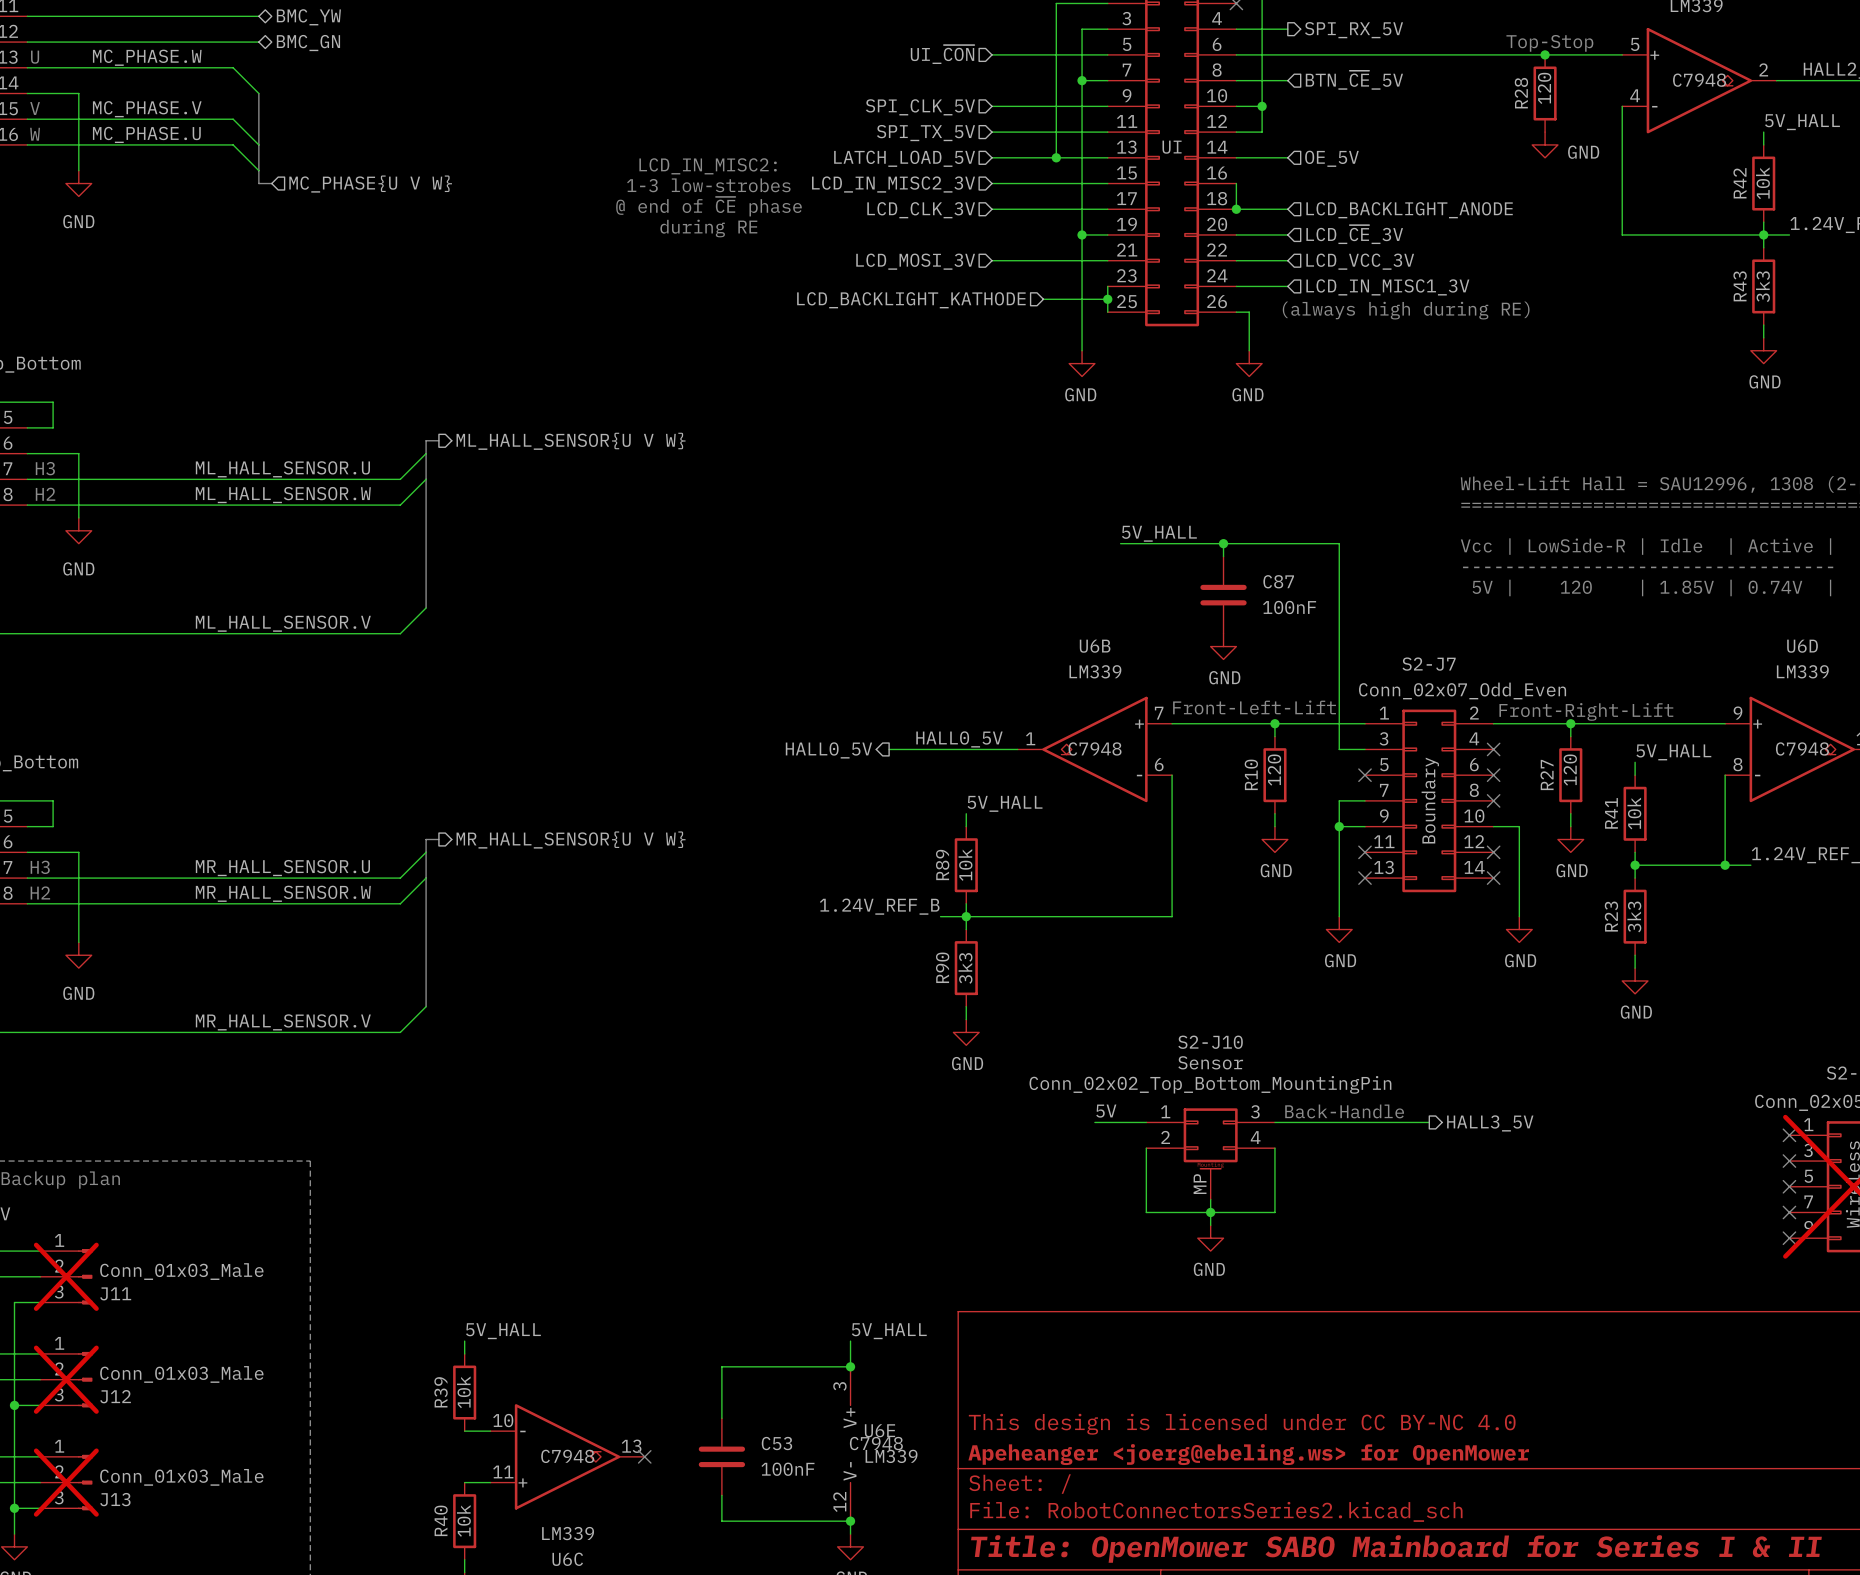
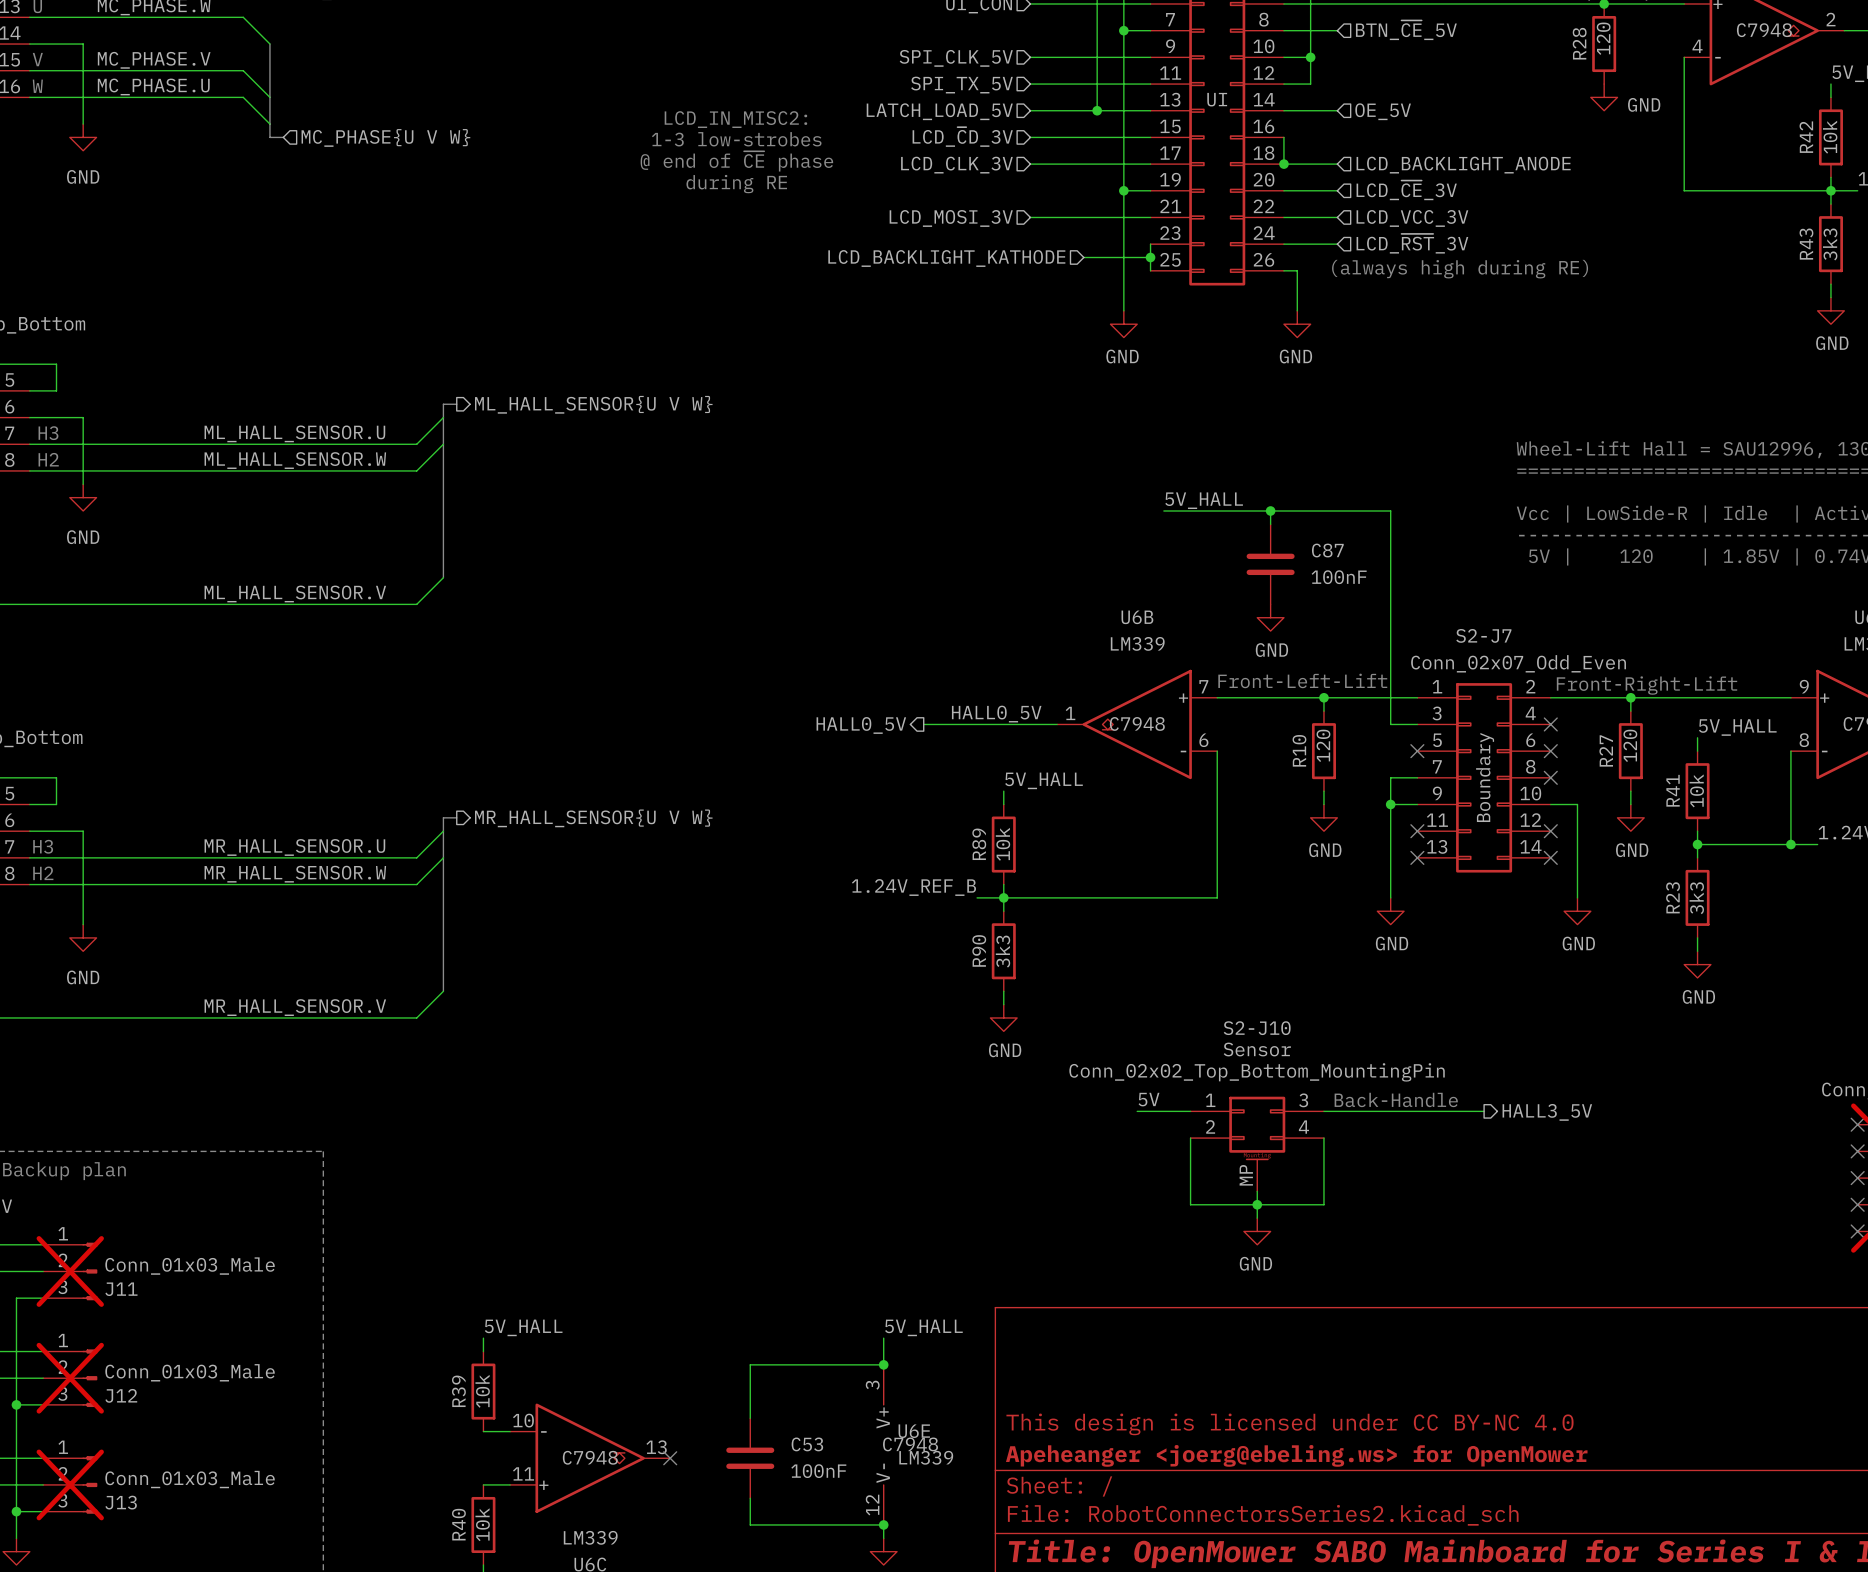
hierarchical label: LCD_IN_MISC2_3V (893, 184) -> LCD_~{C}D_3V (962, 137)
hierarchical label: LCD_IN_MISC1_3V (1387, 287) -> LCD_~{RST}_3V (1412, 243)

